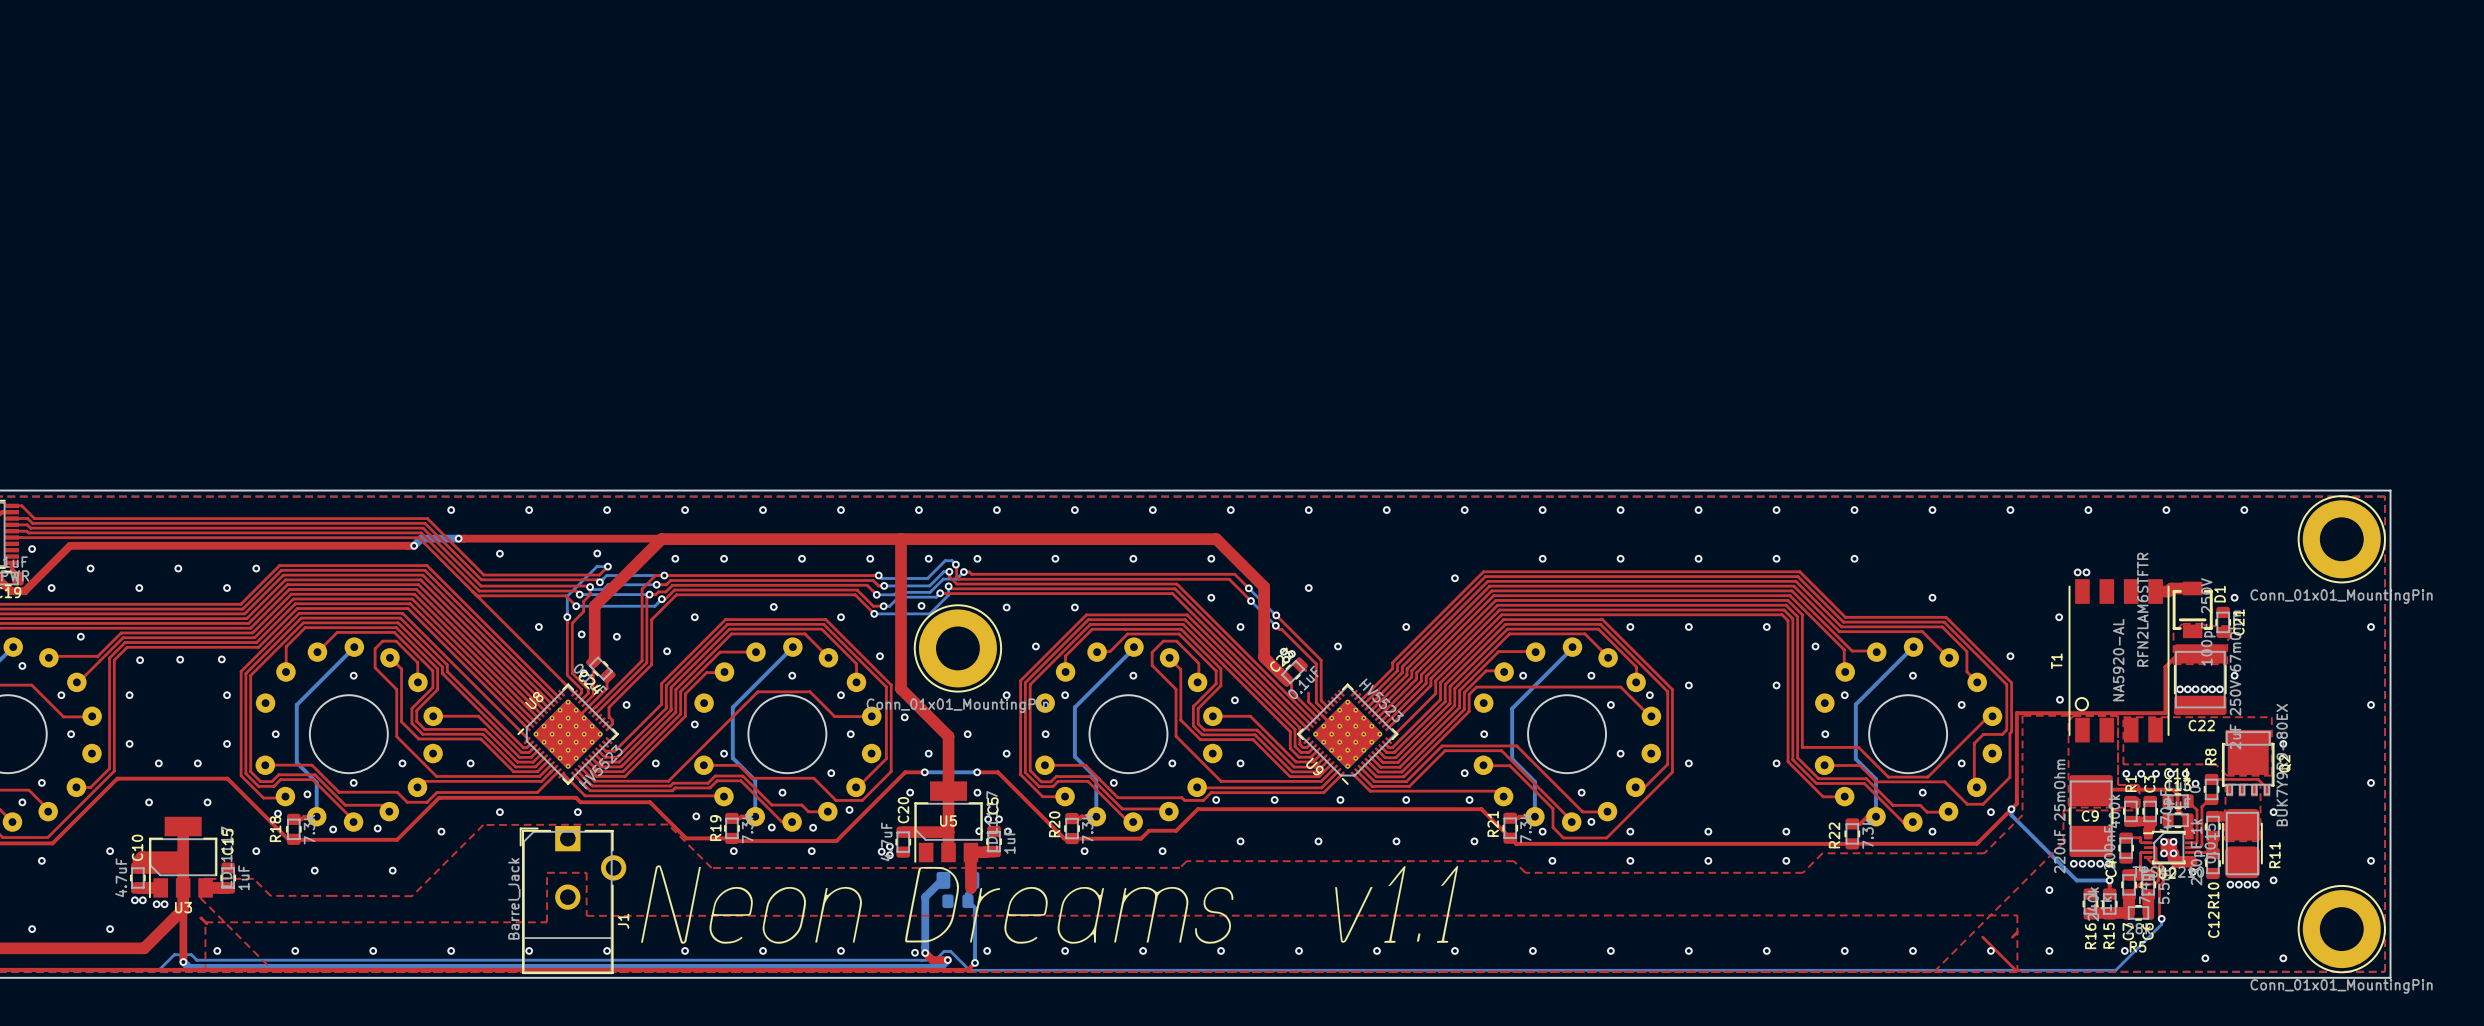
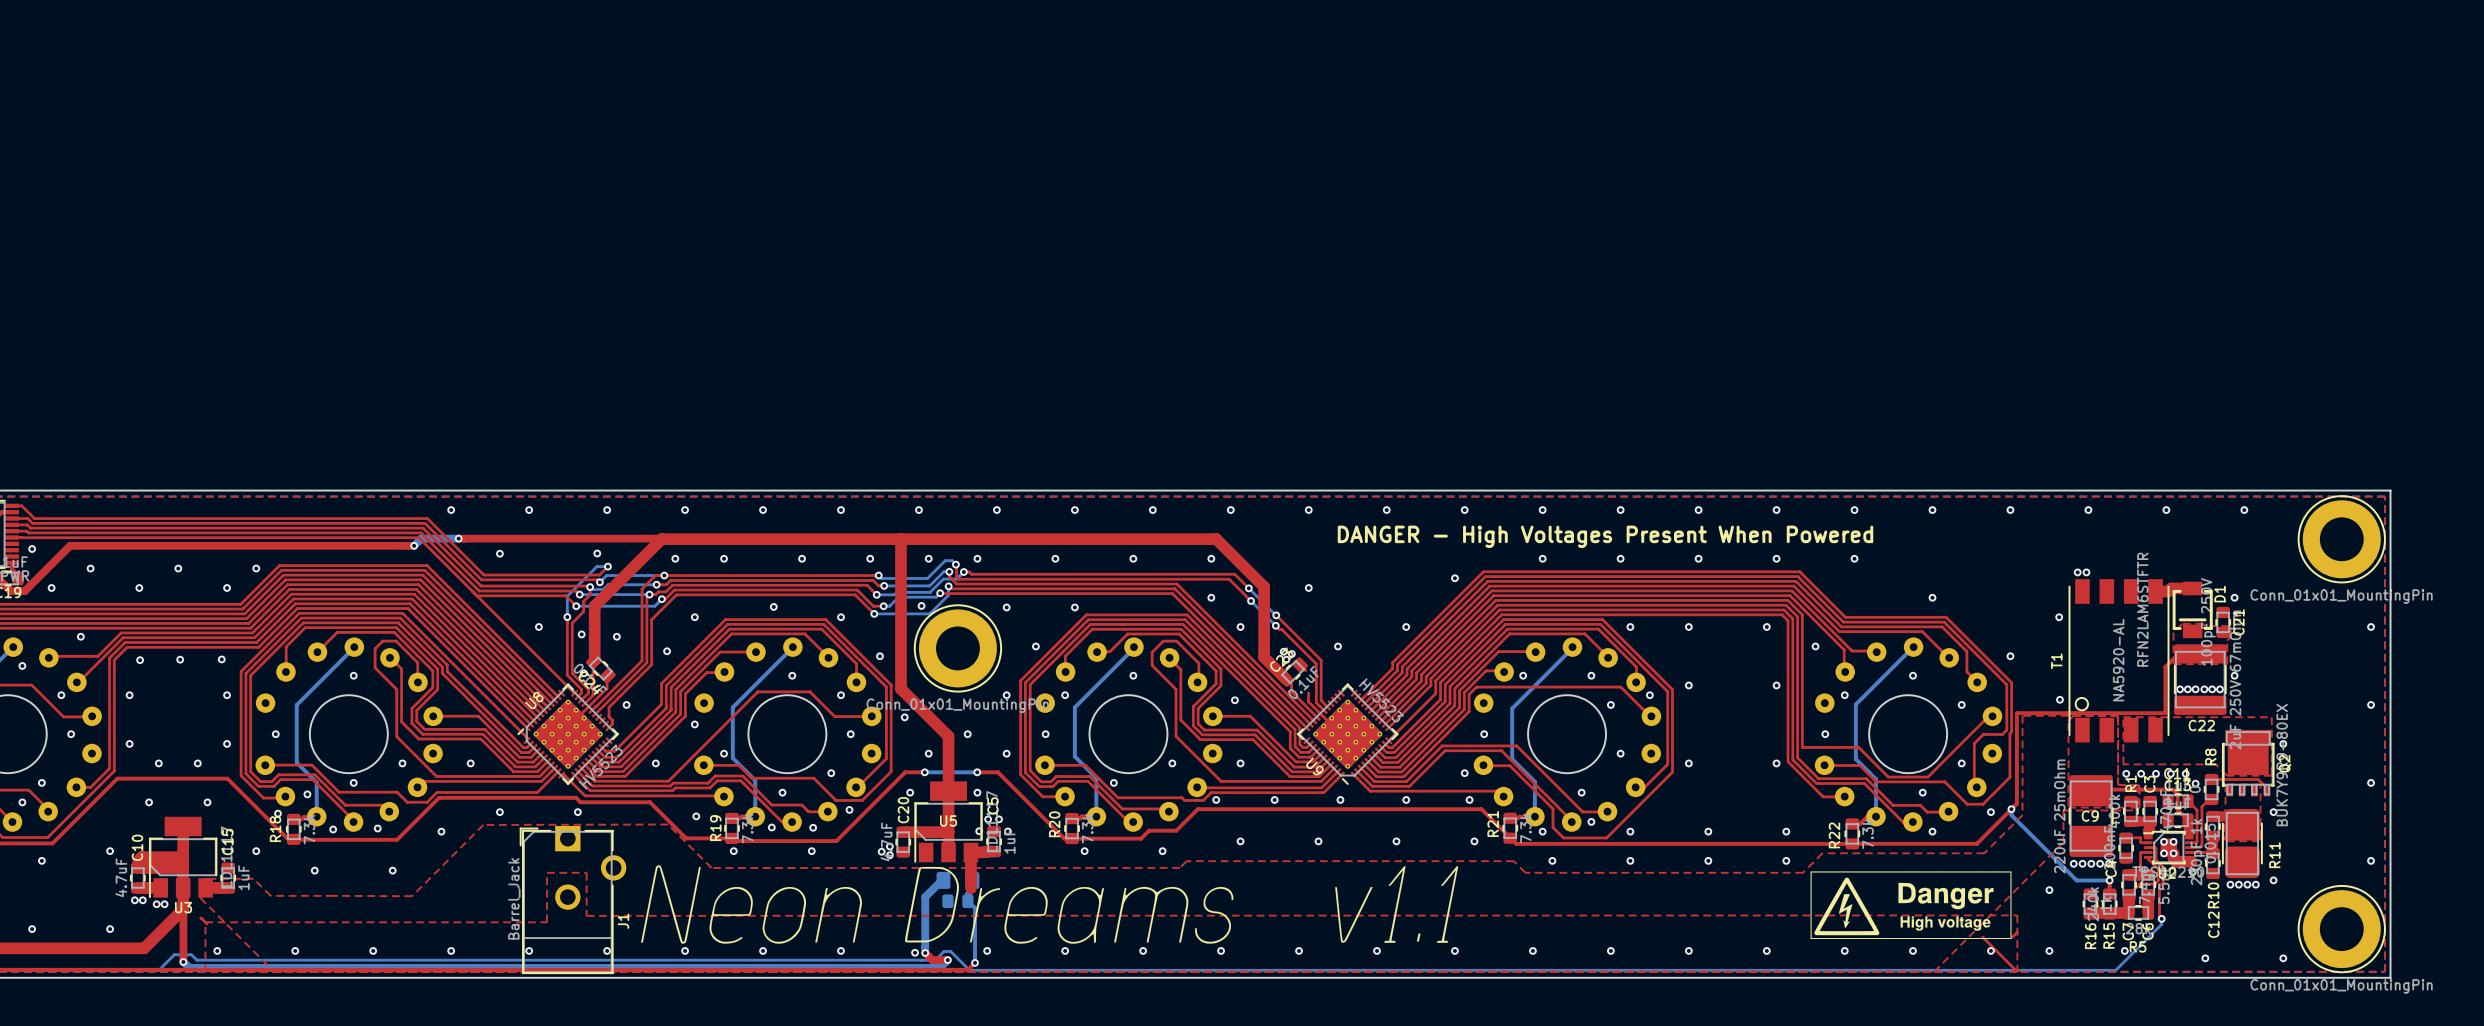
text: none -> DANGER - High Voltages Present When Powered (1605, 536)
drawing: none -> [1810, 871, 2012, 940]

